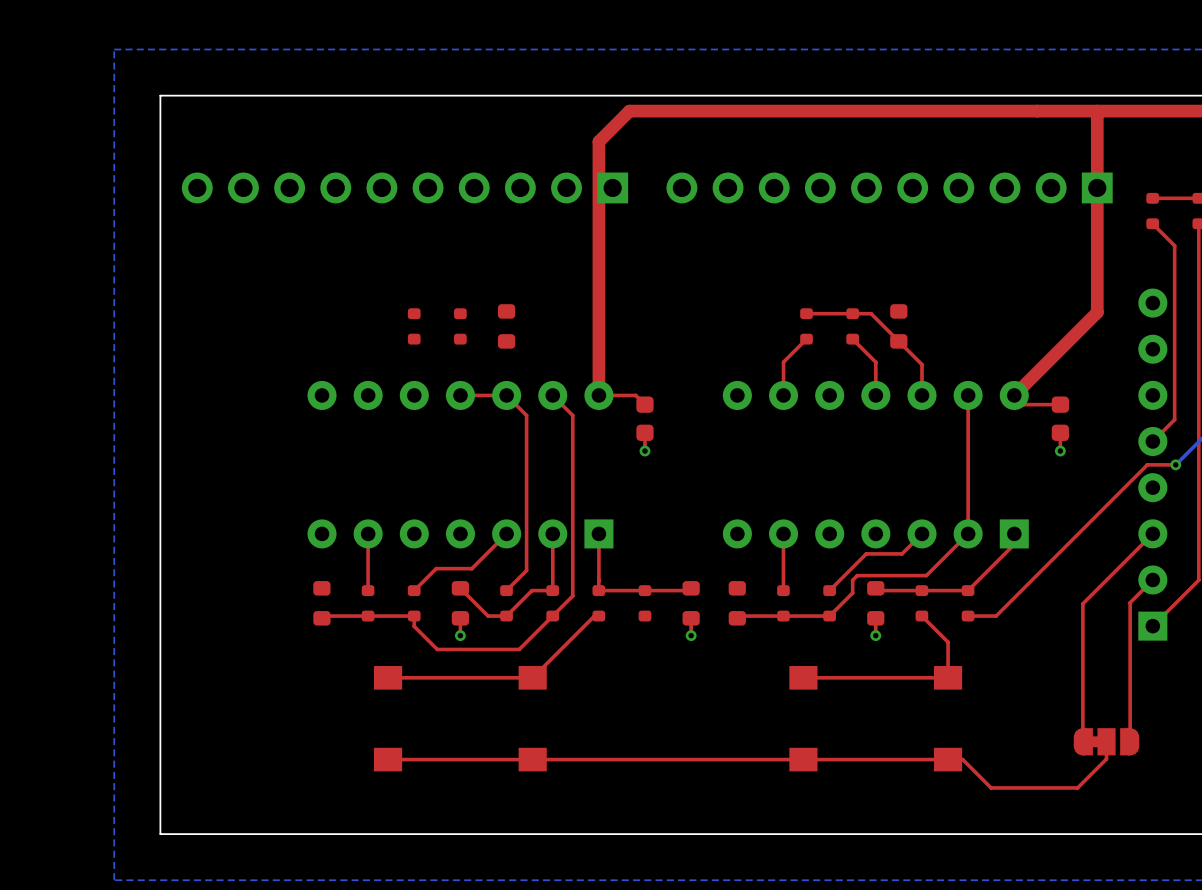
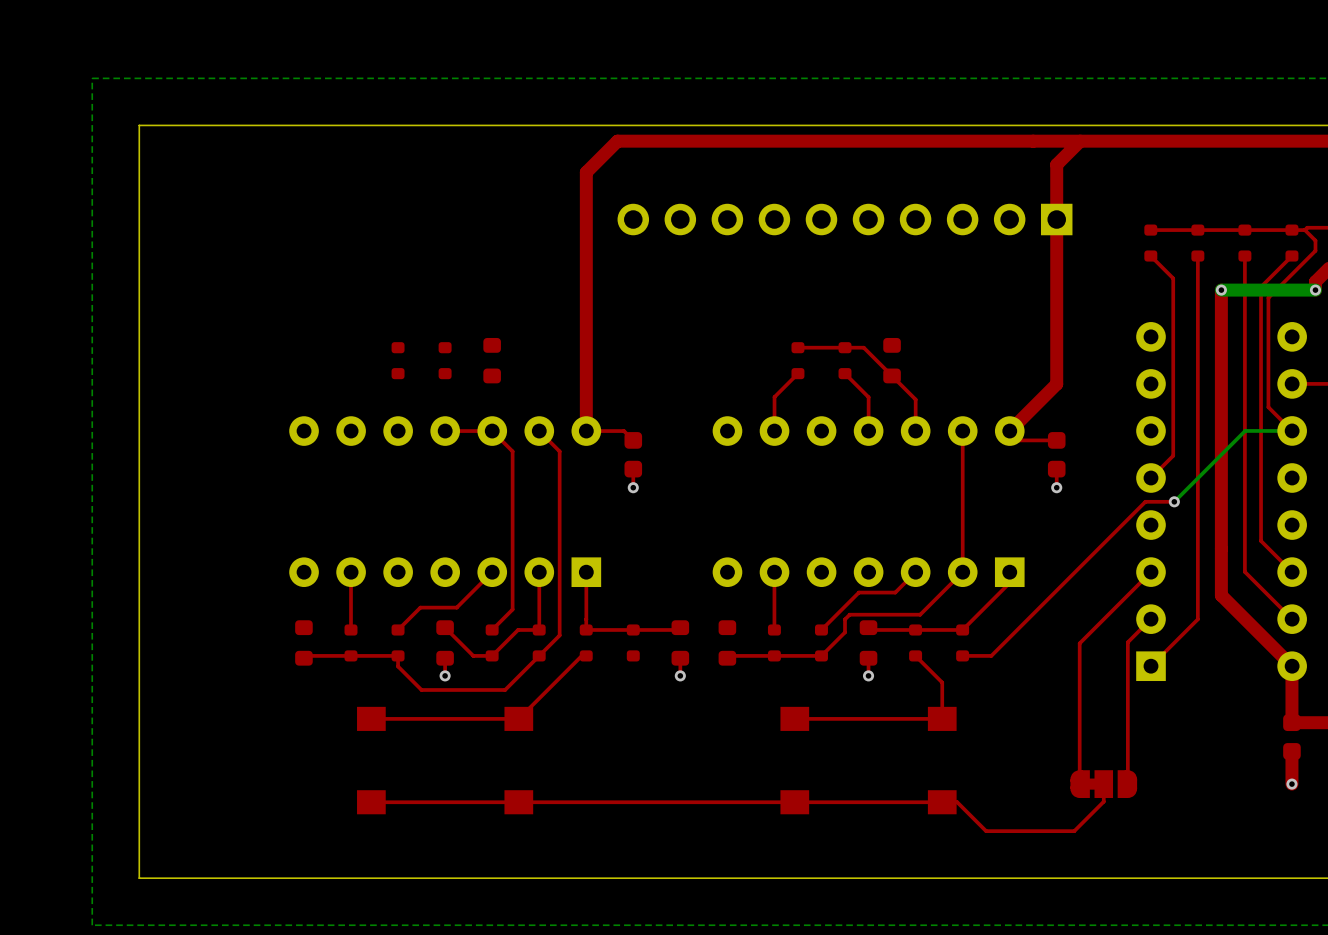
top track: (1097, 111) (1097, 312) (1060, 349) -> (1080, 141) (1056, 164) (1056, 384)
part: (404, 187) -> none
part position: (889, 187) -> (845, 219)

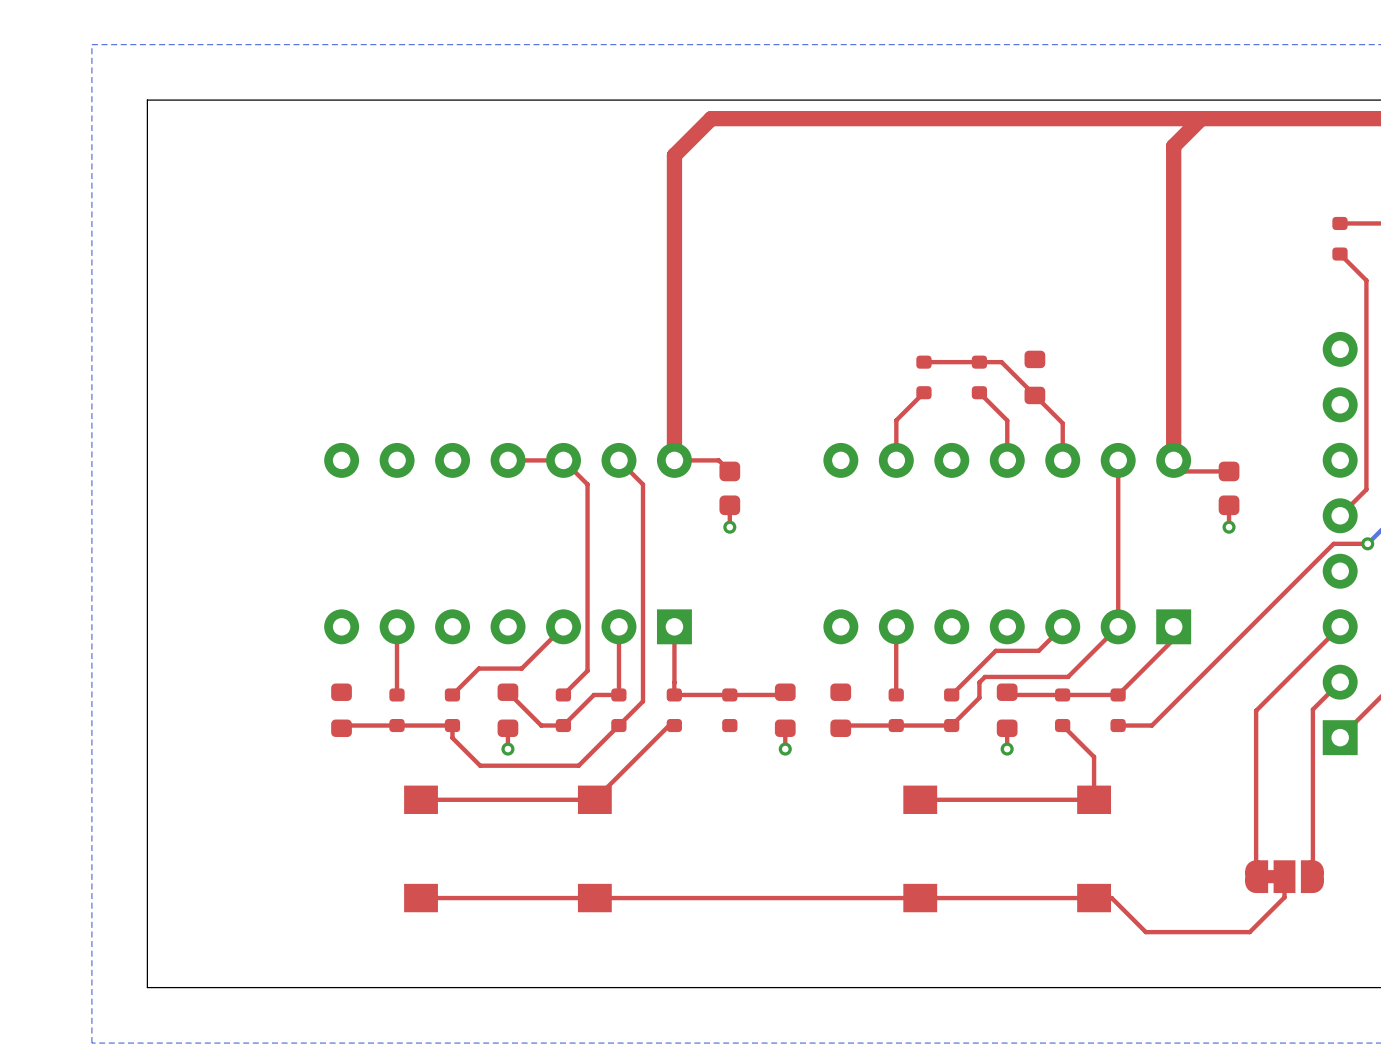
top track: (1080, 141) (1056, 164) (1056, 384) (1009, 431) -> (1201, 118) (1173, 146) (1173, 460)
part: (845, 219) -> none
part: (398, 360) -> none
part: (445, 360) -> none
part: (492, 360) -> none

